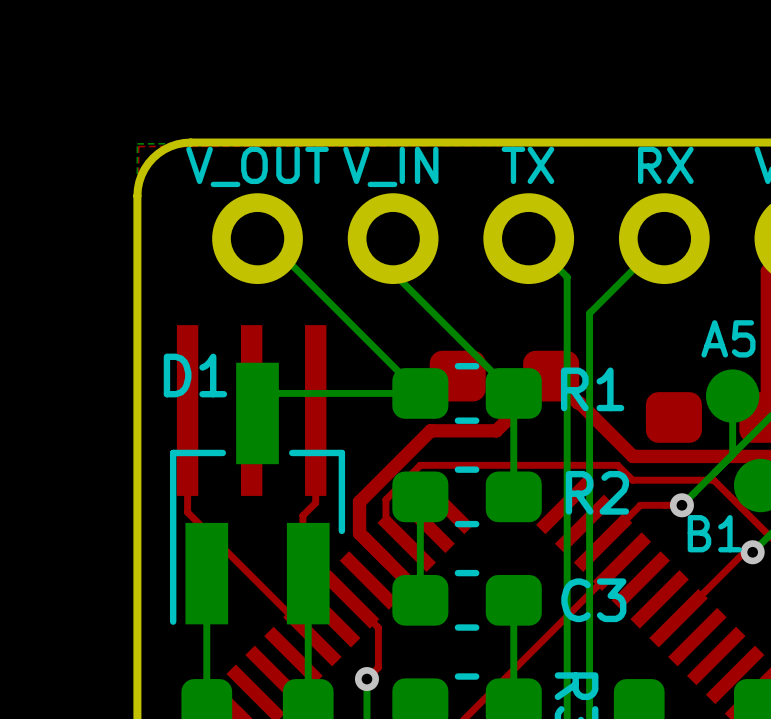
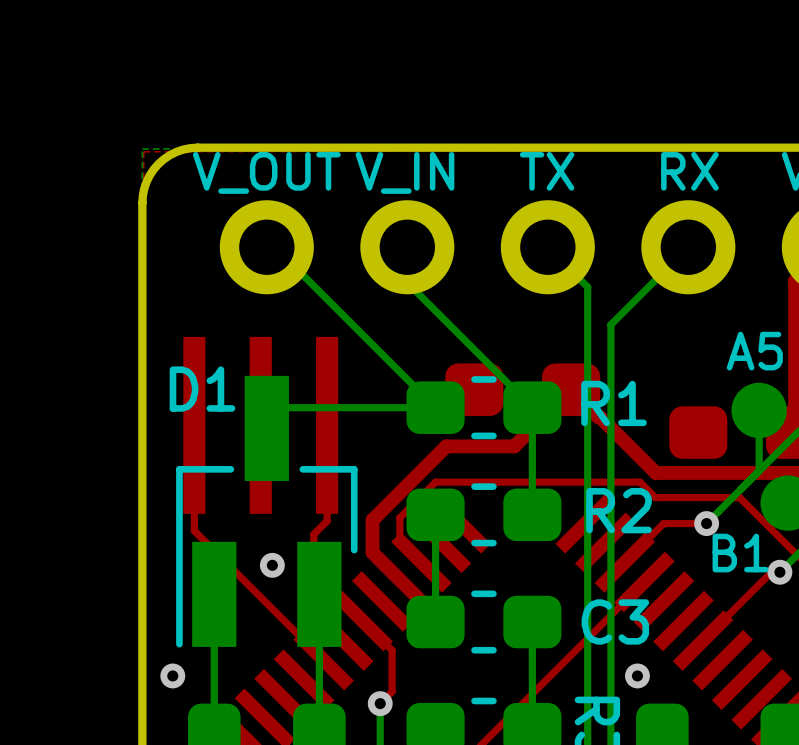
via: none -> (272, 565)
via: none -> (172, 675)
via: none -> (637, 675)

